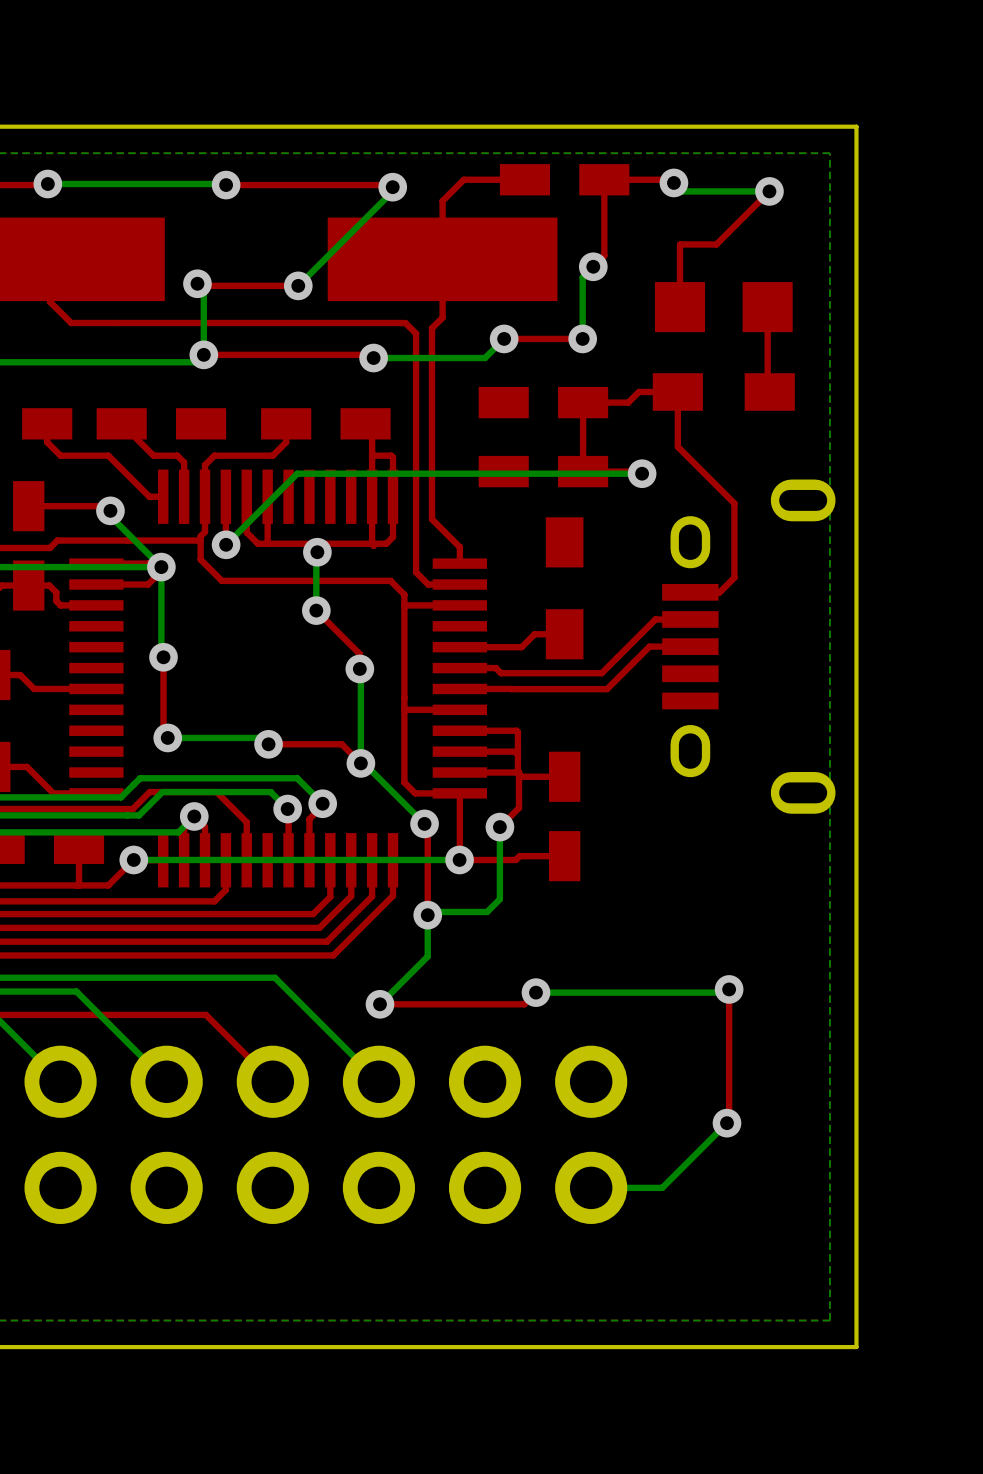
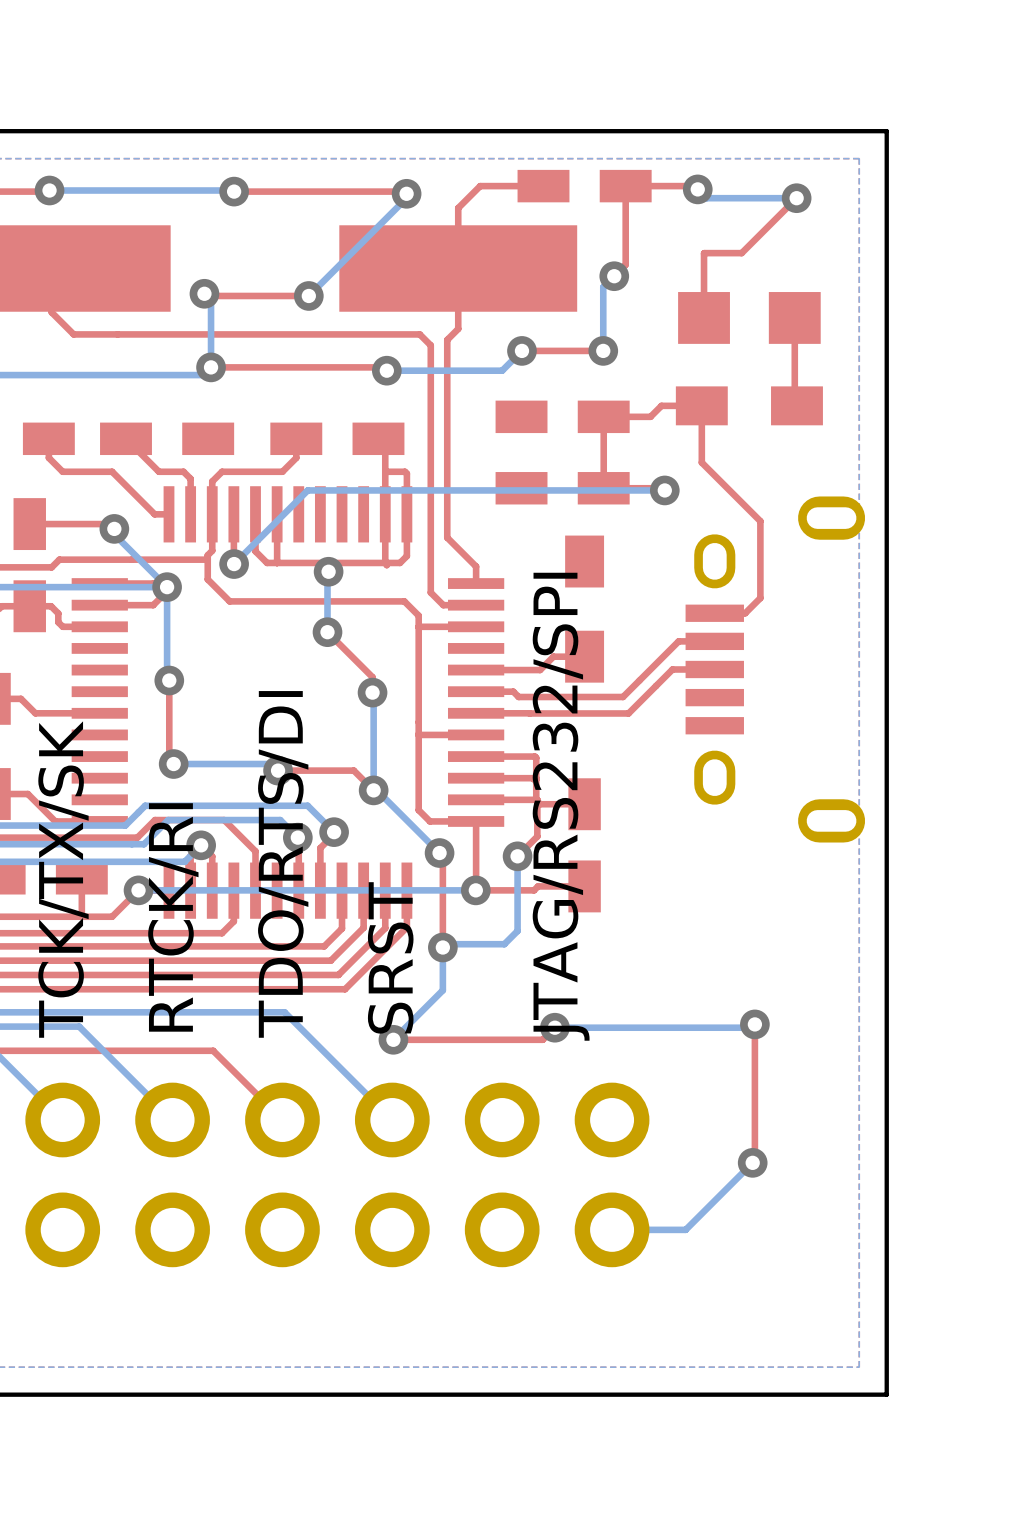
text: none -> JTAG/RS232/SPI (561, 806)
text: none -> TDO/RTS/DI (283, 864)
text: none -> TCK/TX/SK (63, 879)
text: none -> RTCK/RI (173, 917)
text: none -> SRST (390, 957)

